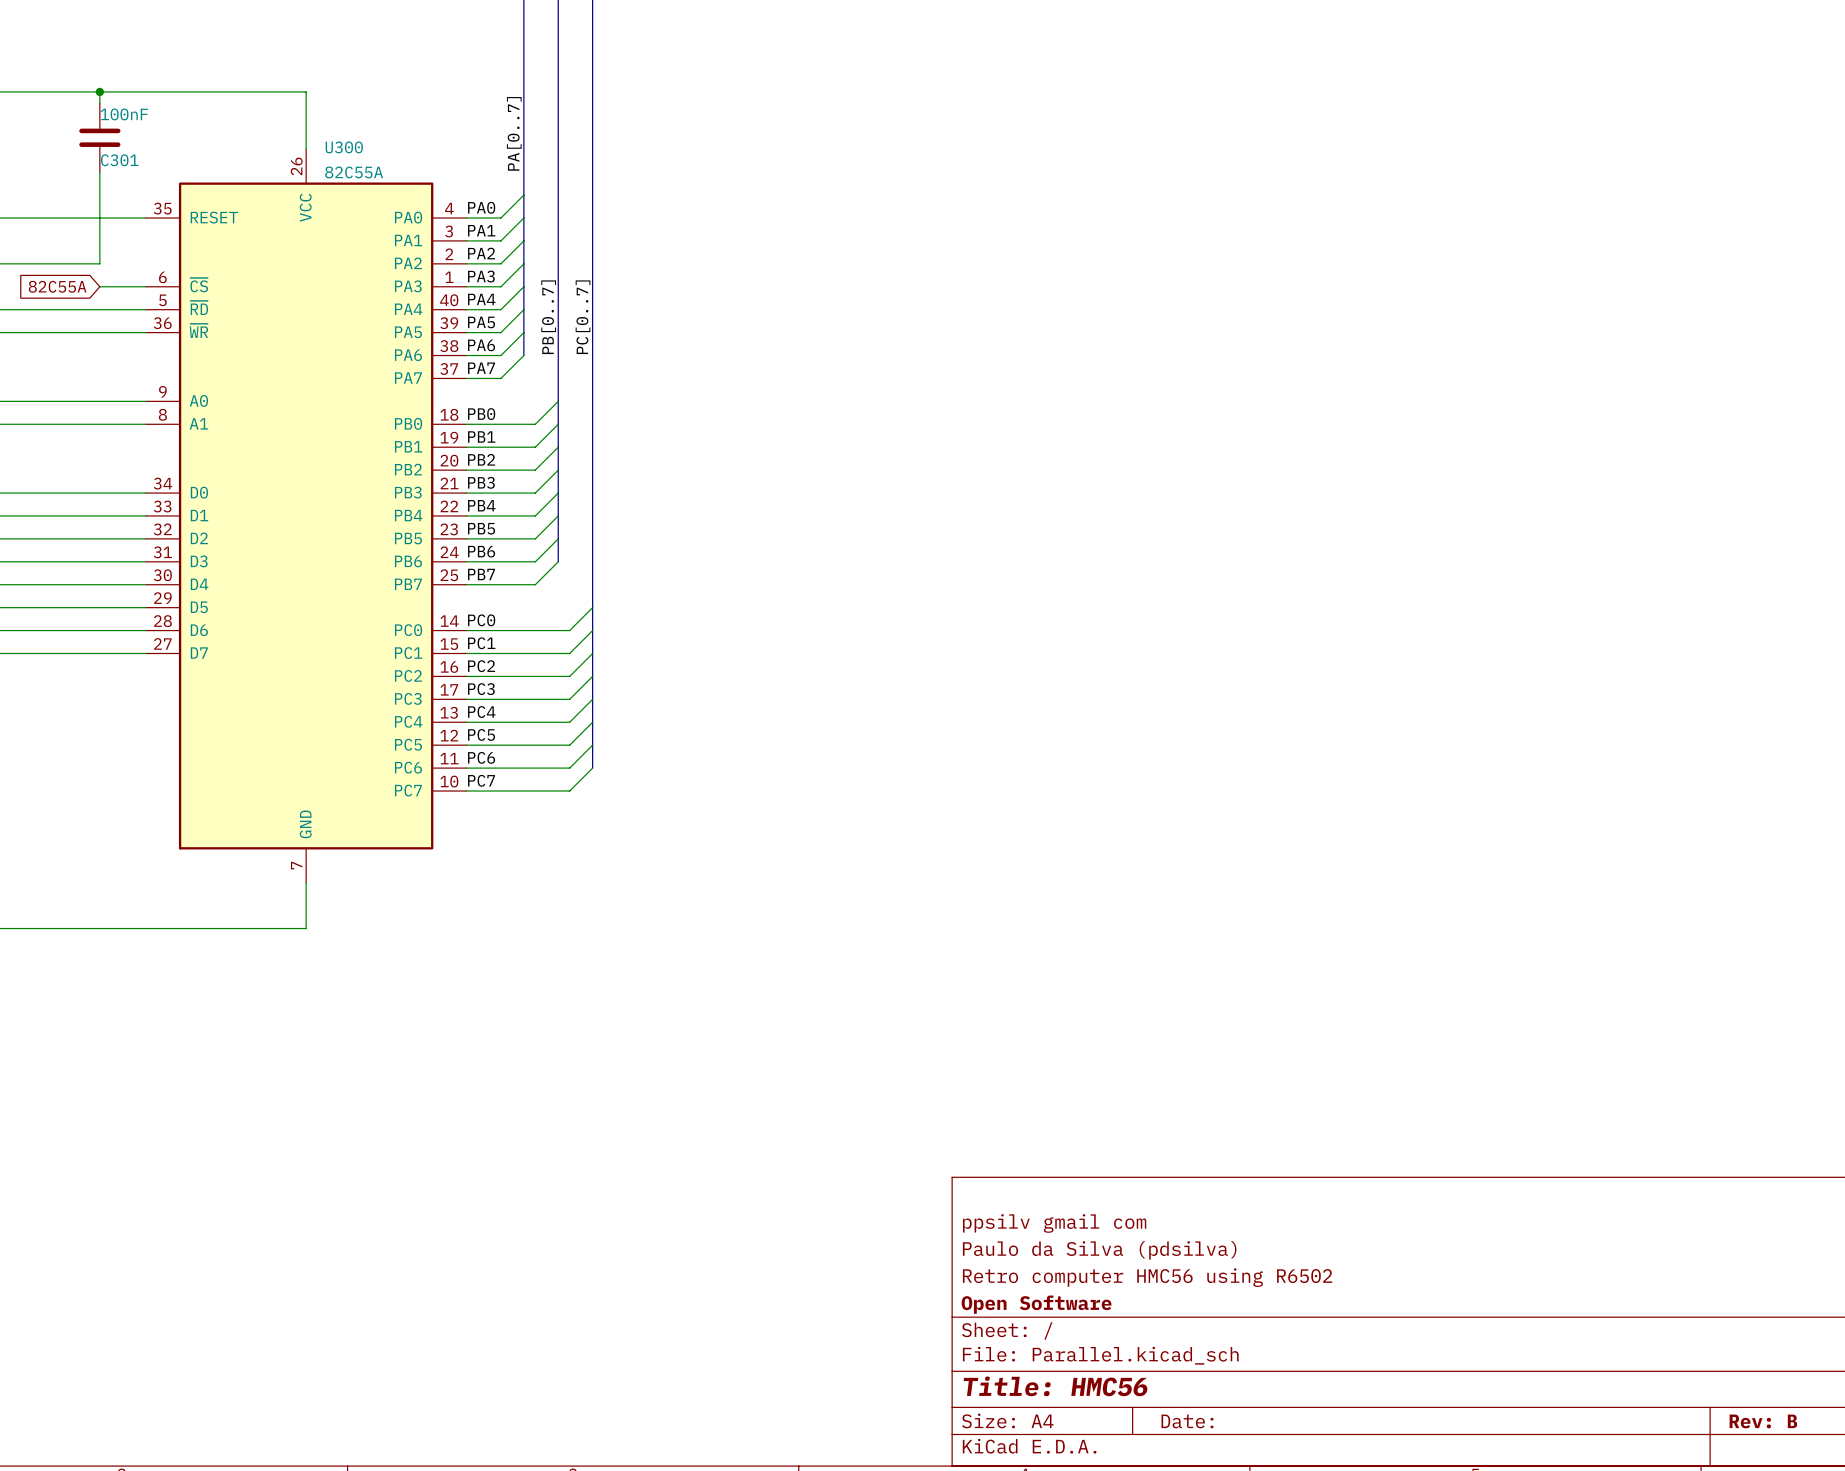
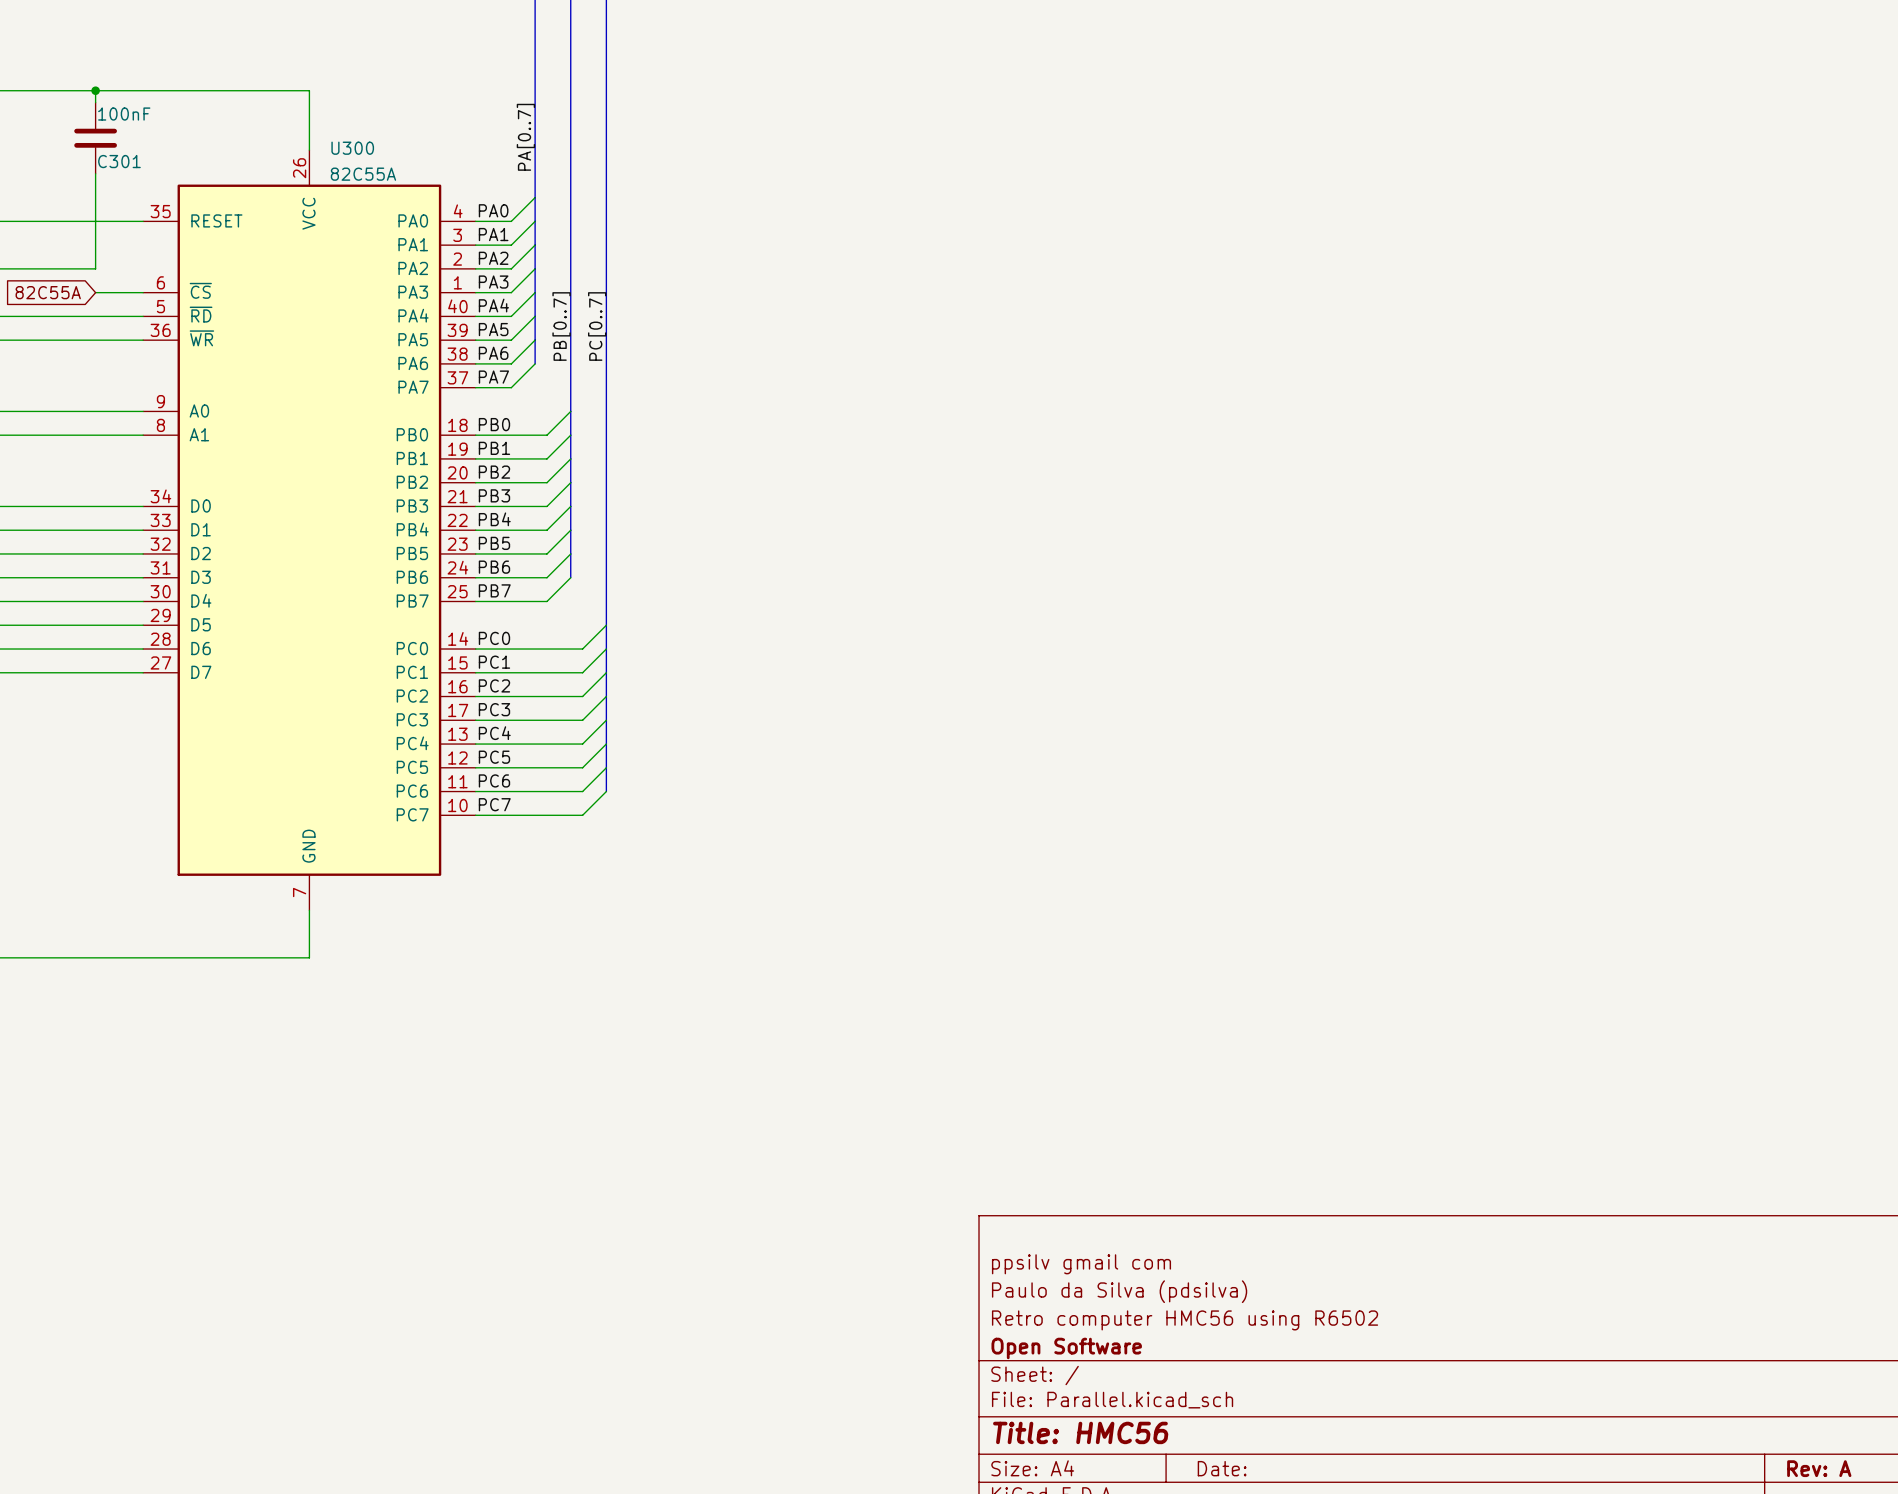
title block: Rev: B (1763, 1421) -> Rev: A (1819, 1468)

